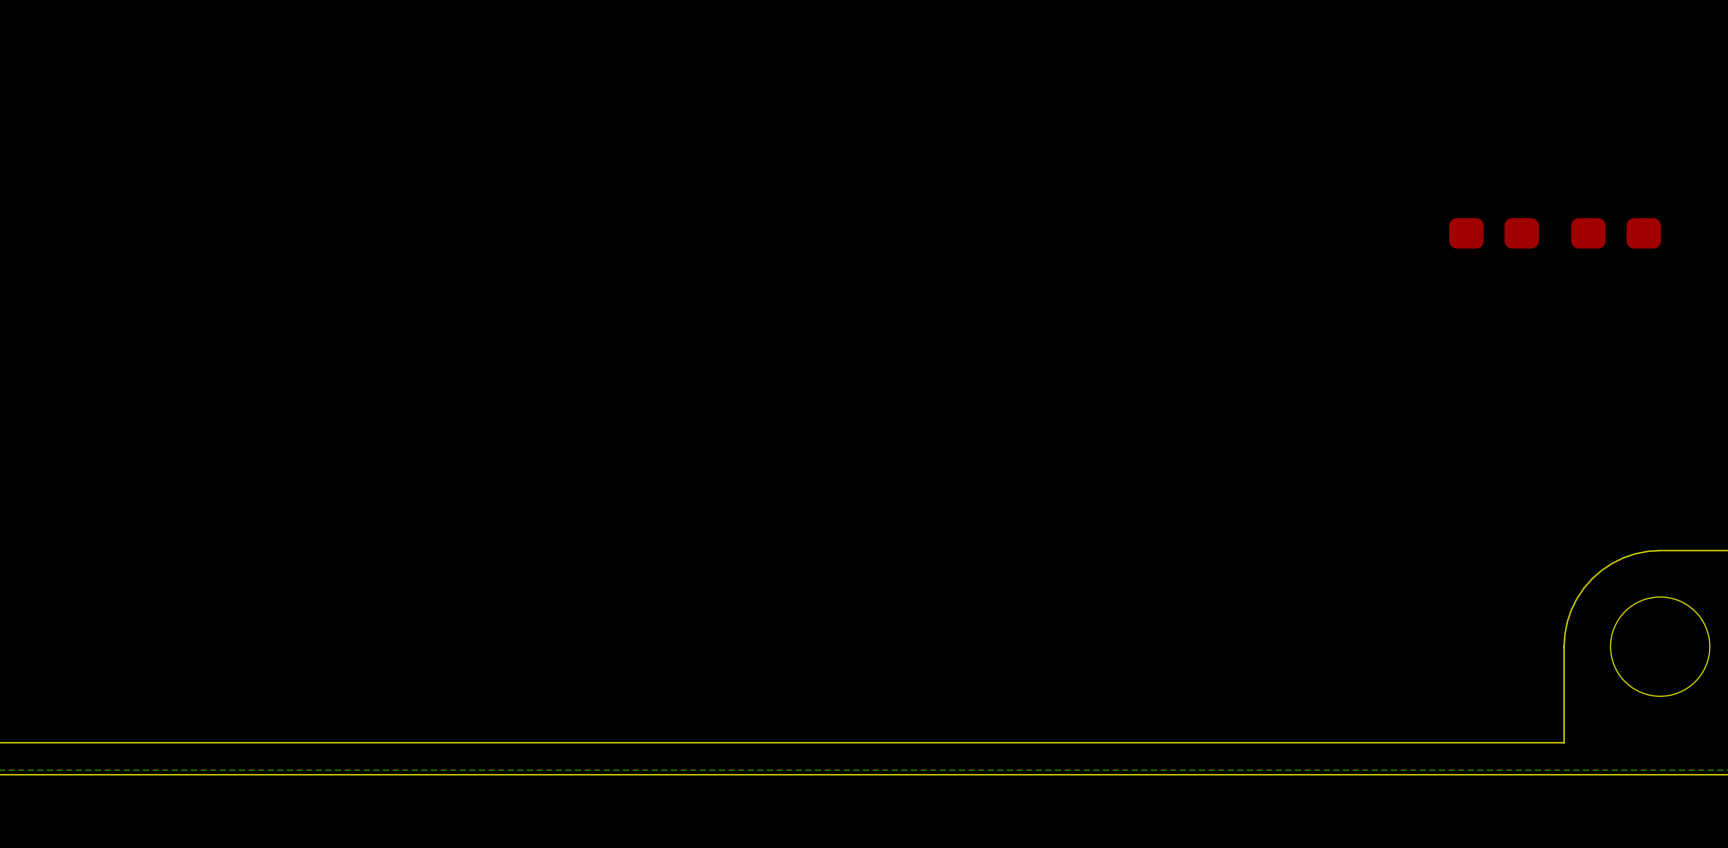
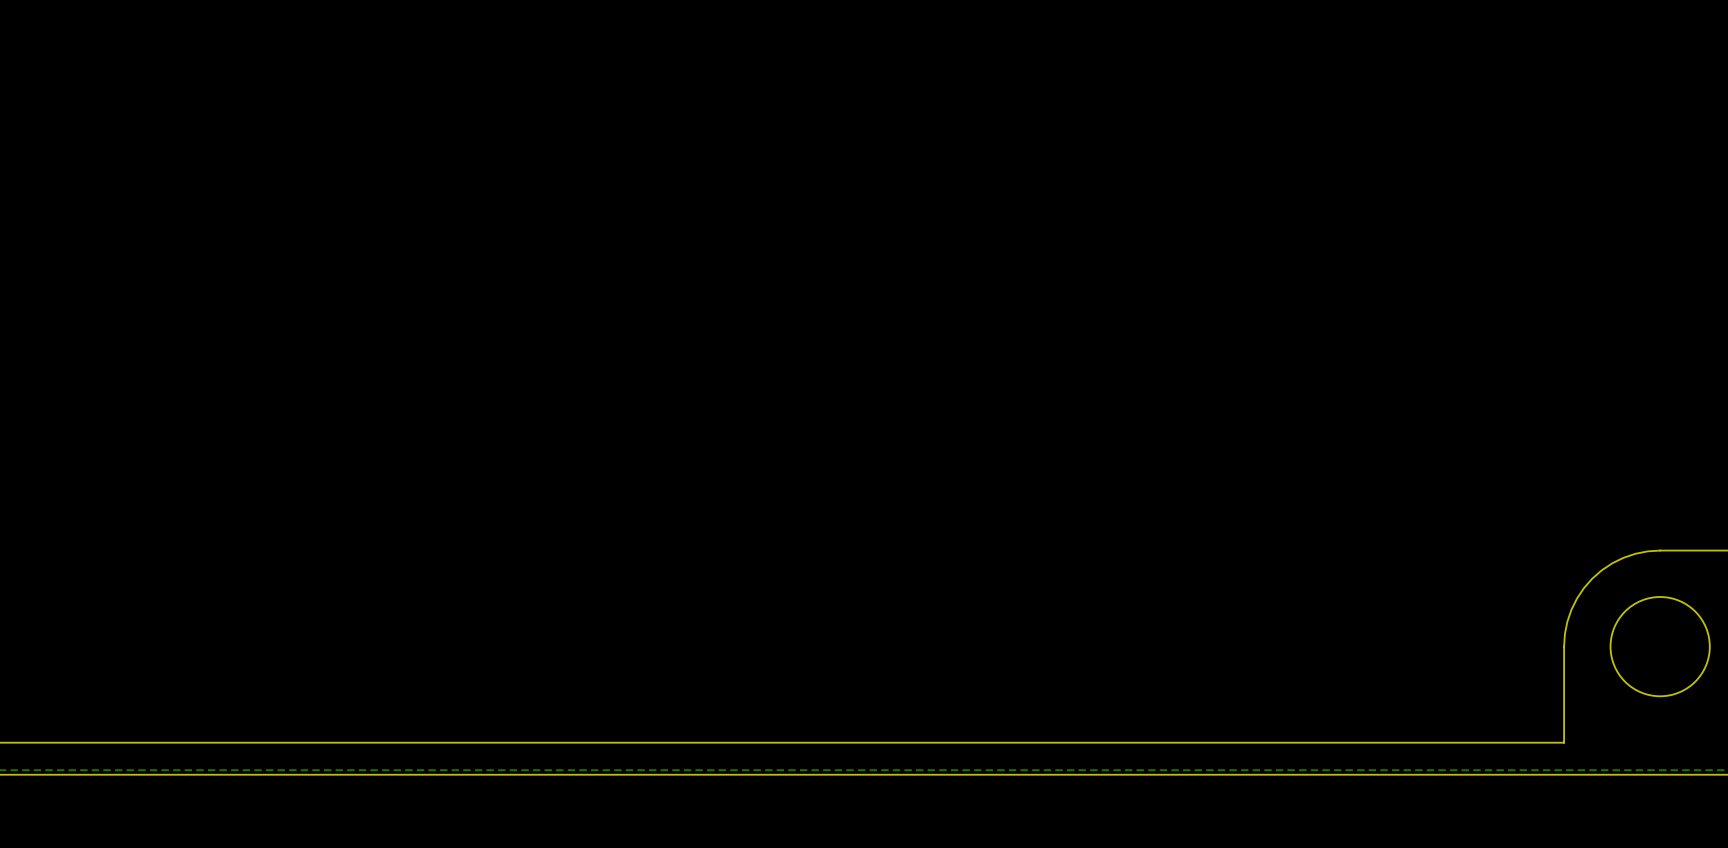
part: (1494, 233) -> none
part: (1616, 233) -> none

